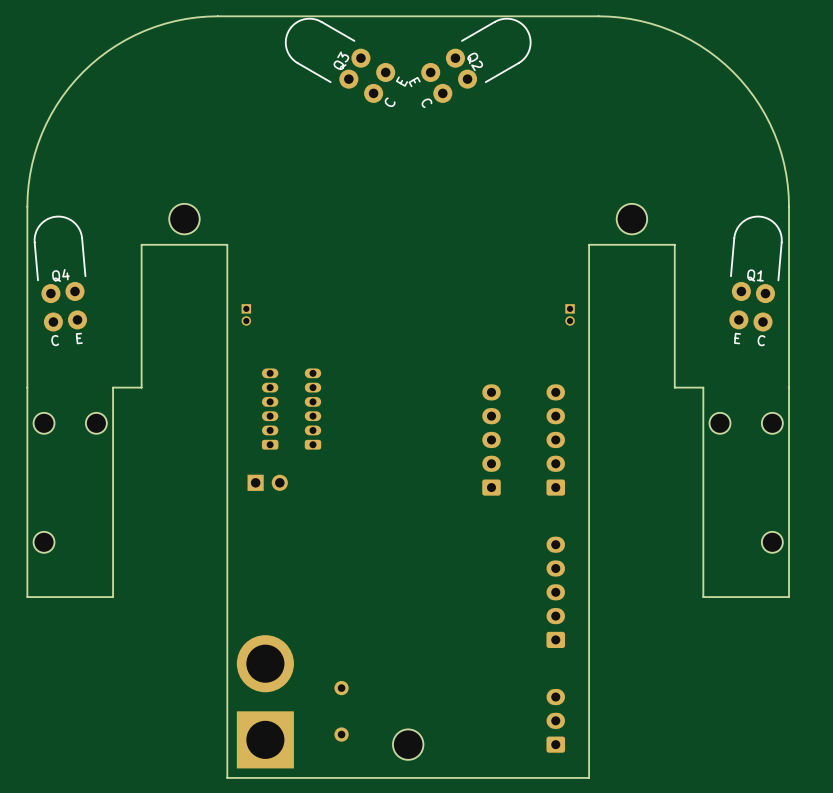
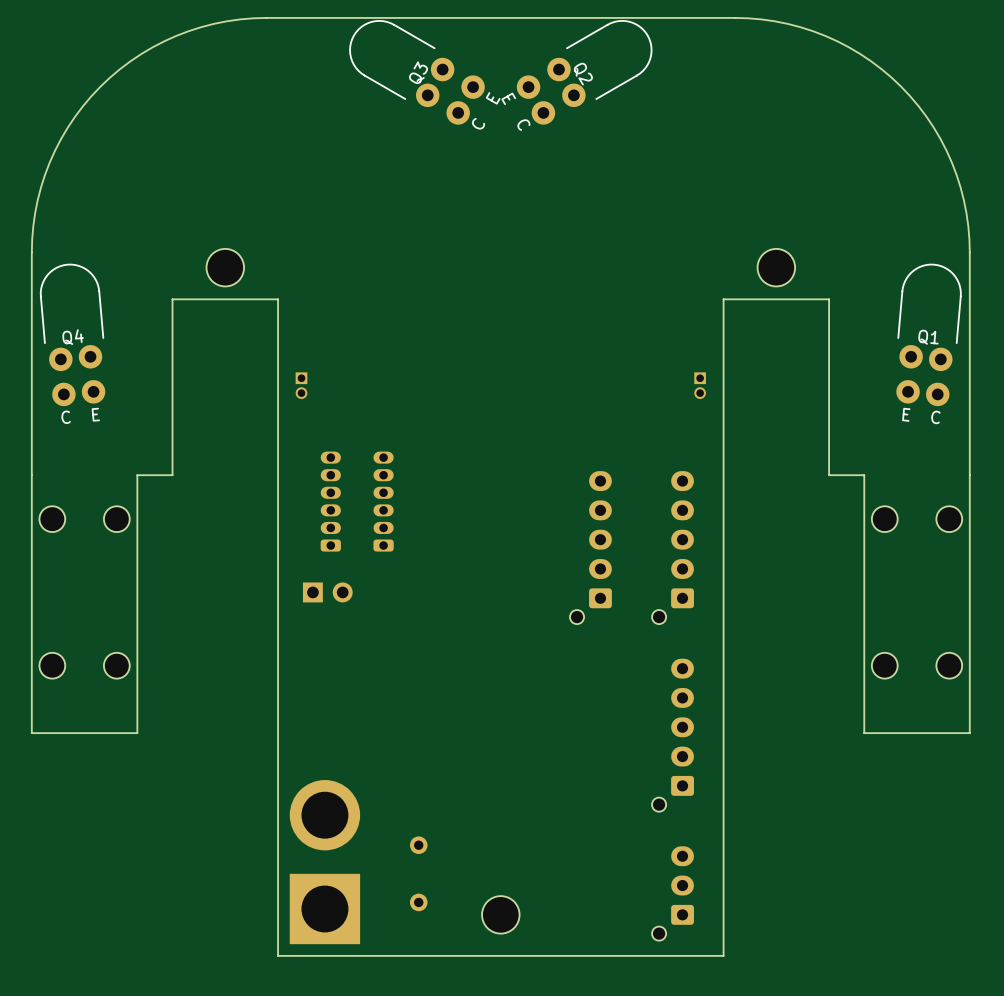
part: (491, 439) -> none
part: none -> (590, 547)
part: none -> (673, 547)
part: none -> (116, 665)
part: none -> (884, 665)
part: none -> (673, 735)
part: none -> (673, 893)

